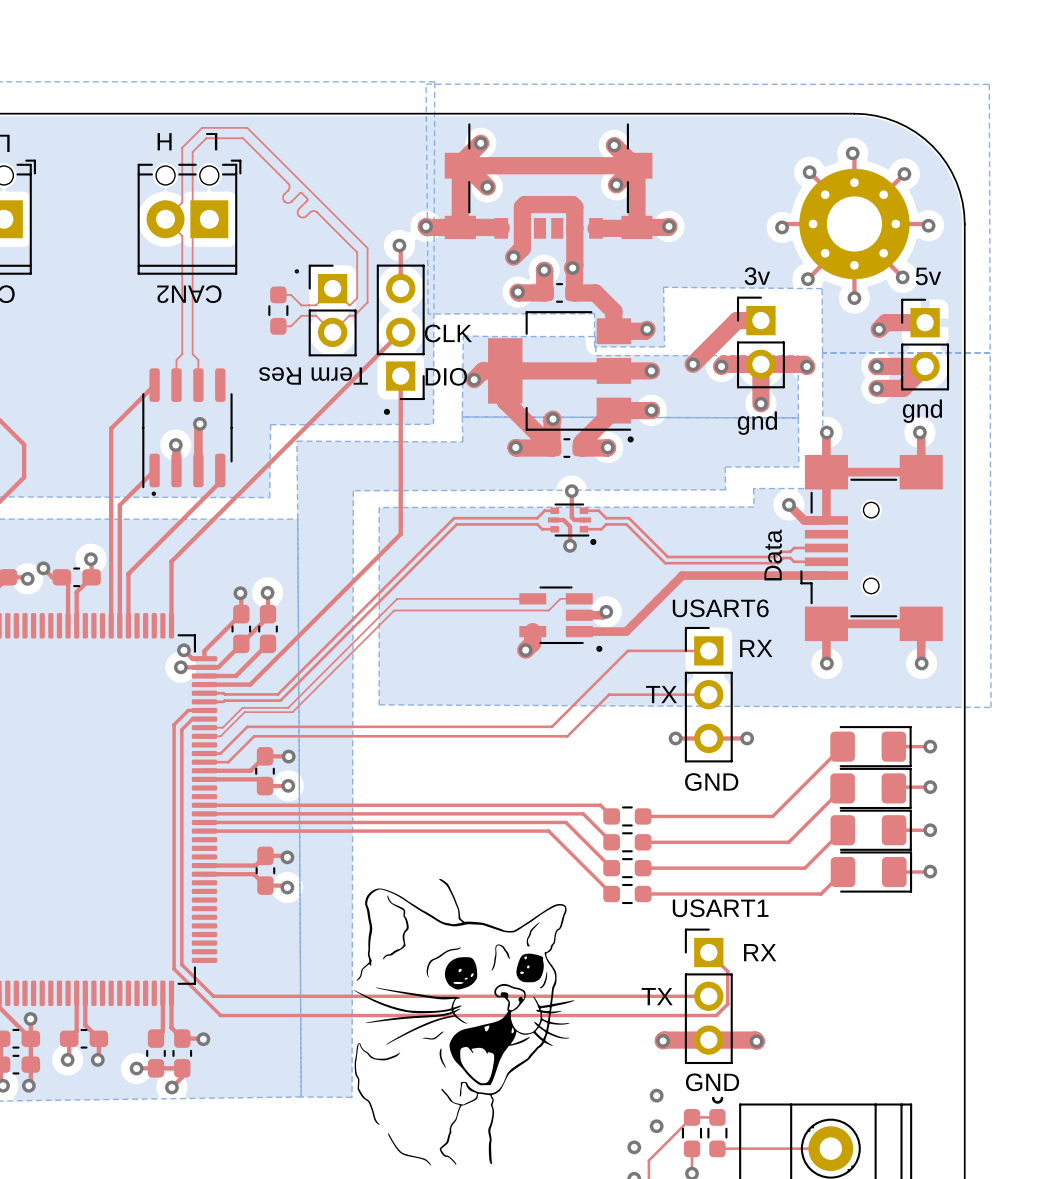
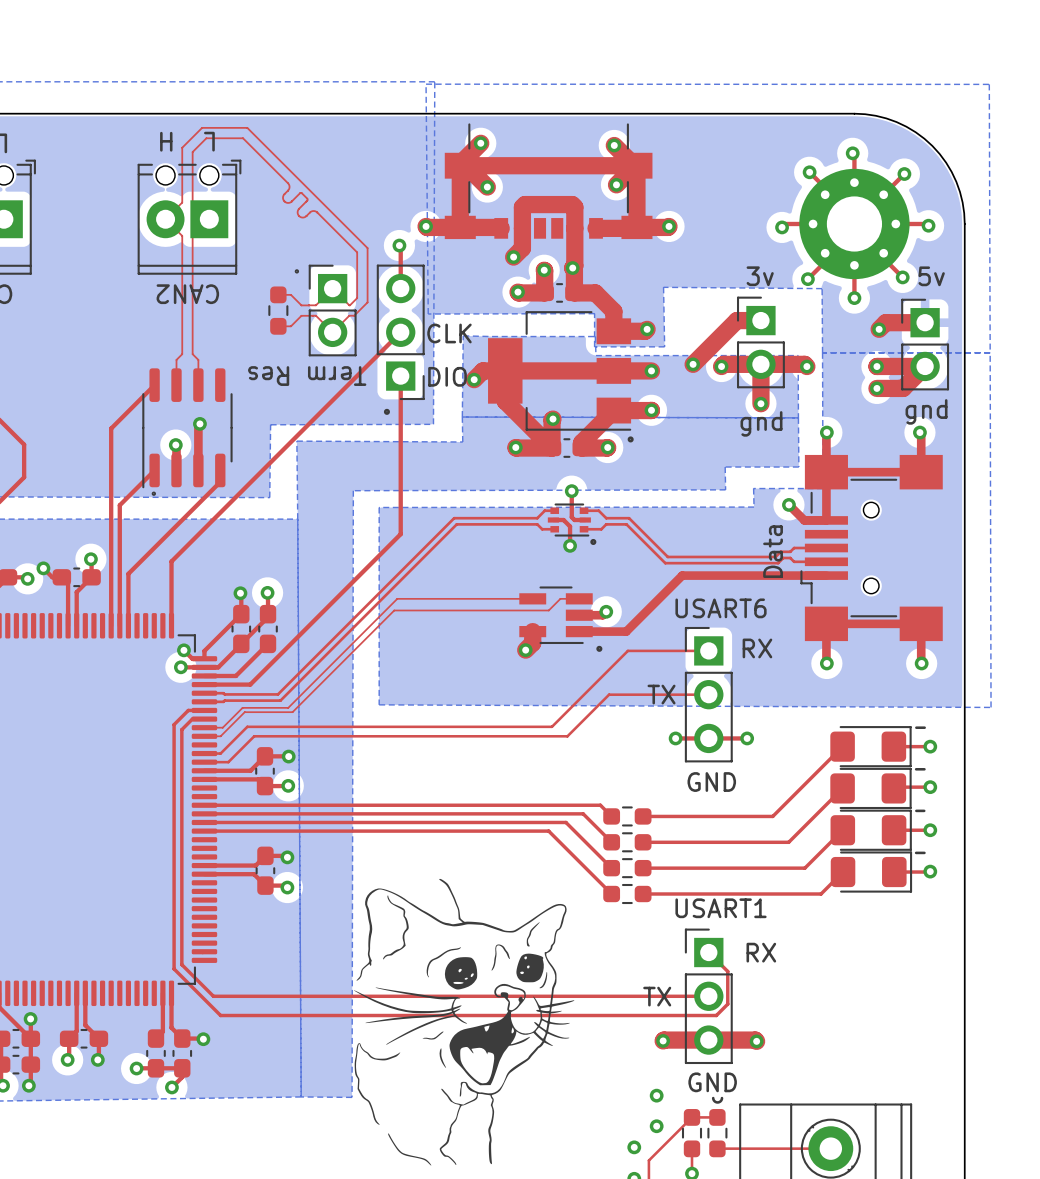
line: none -> (916, 727) (924, 727)
line: none -> (916, 769) (924, 769)
line: none -> (916, 810) (924, 810)
line: none -> (916, 852) (924, 852)

